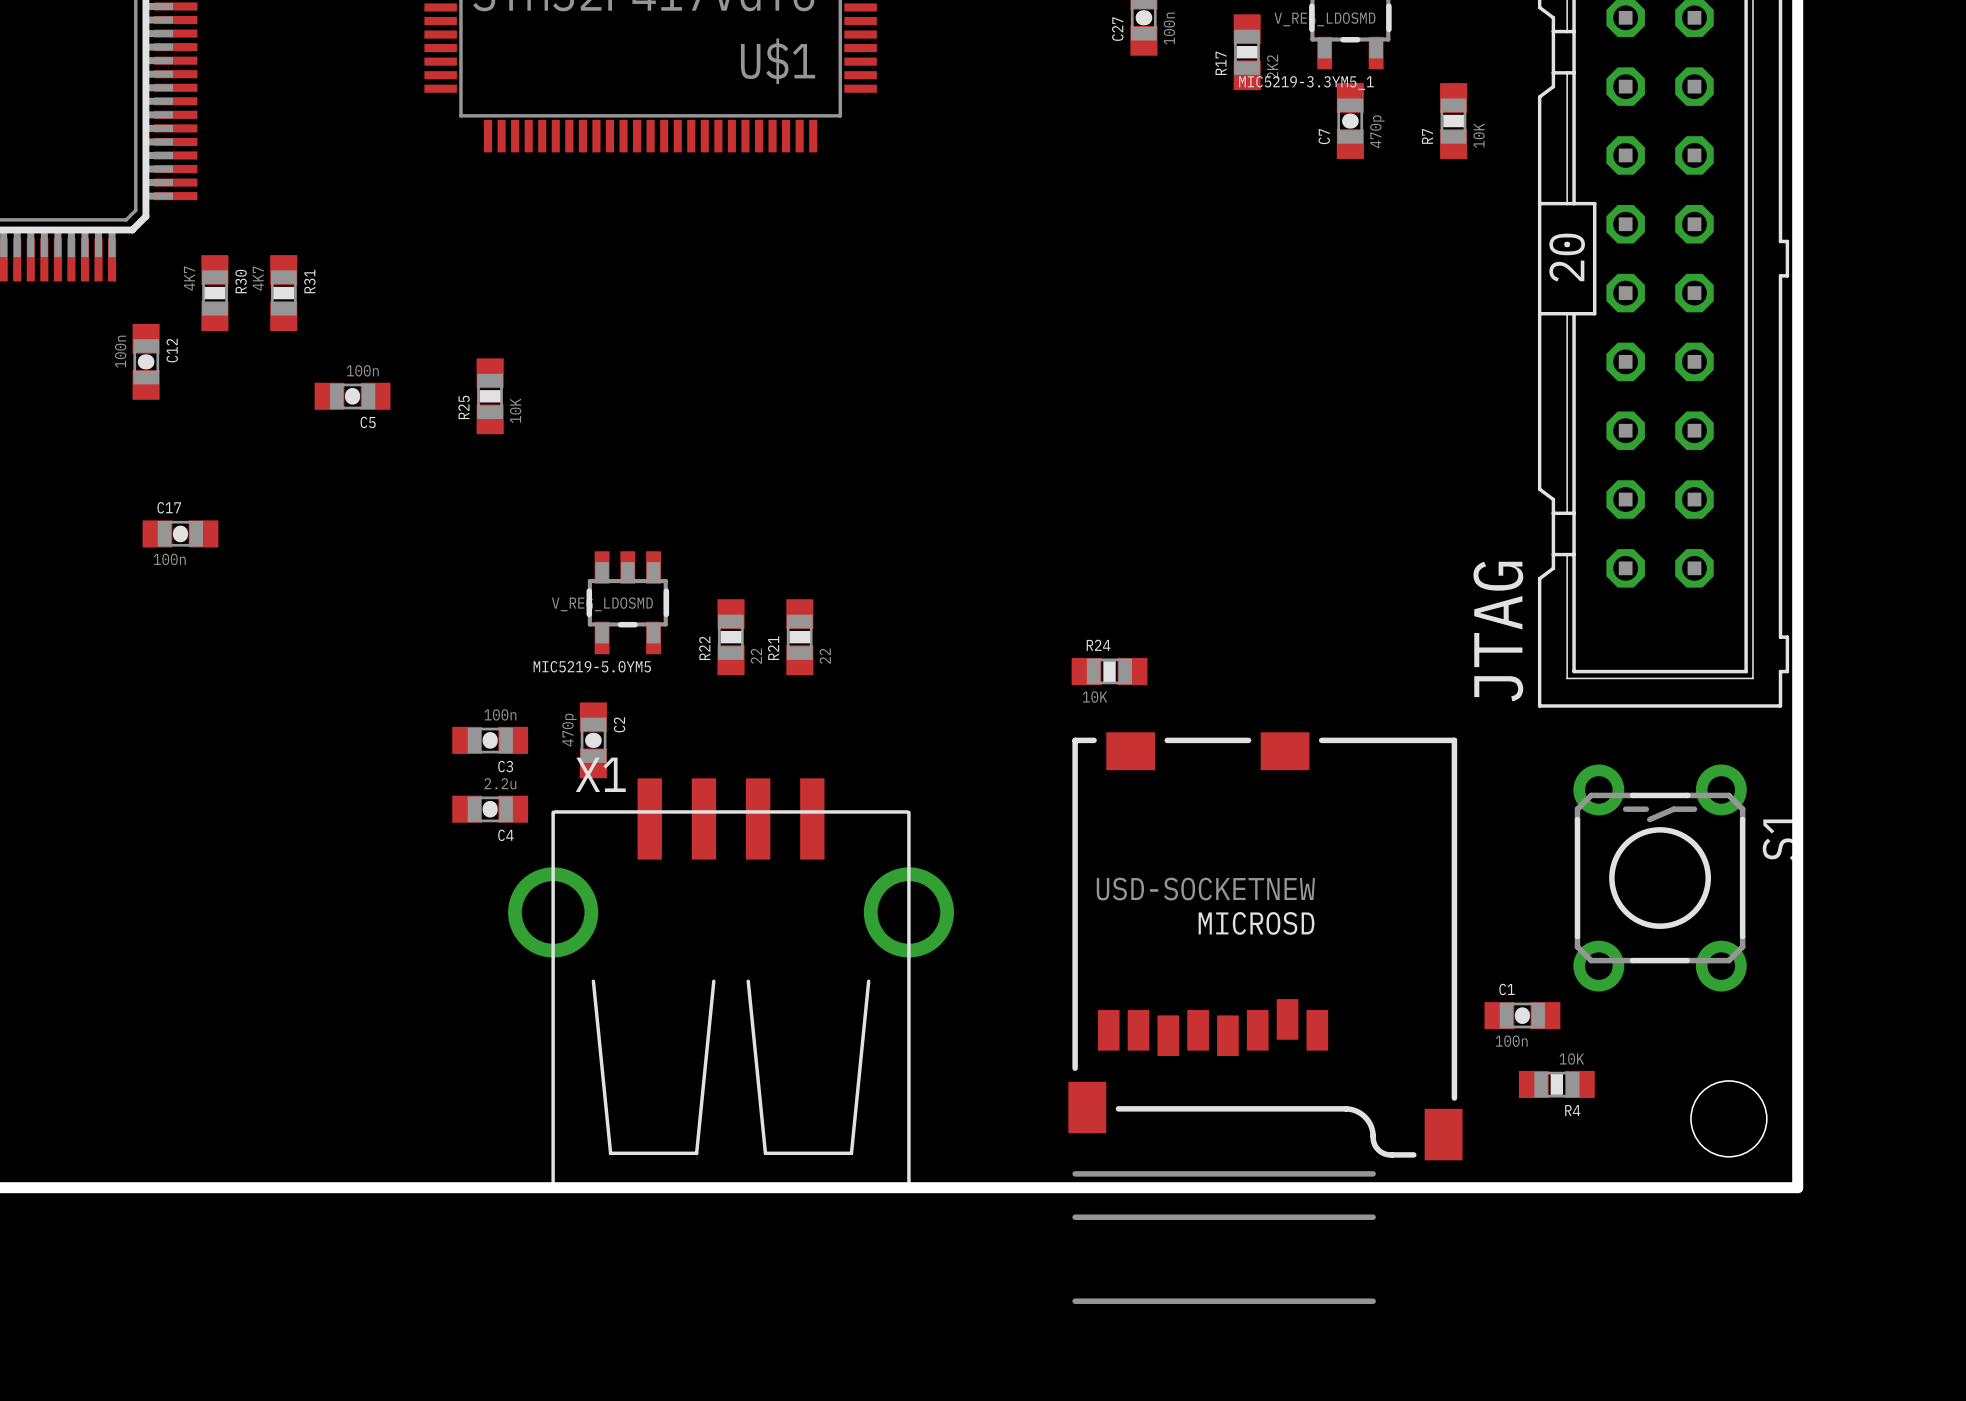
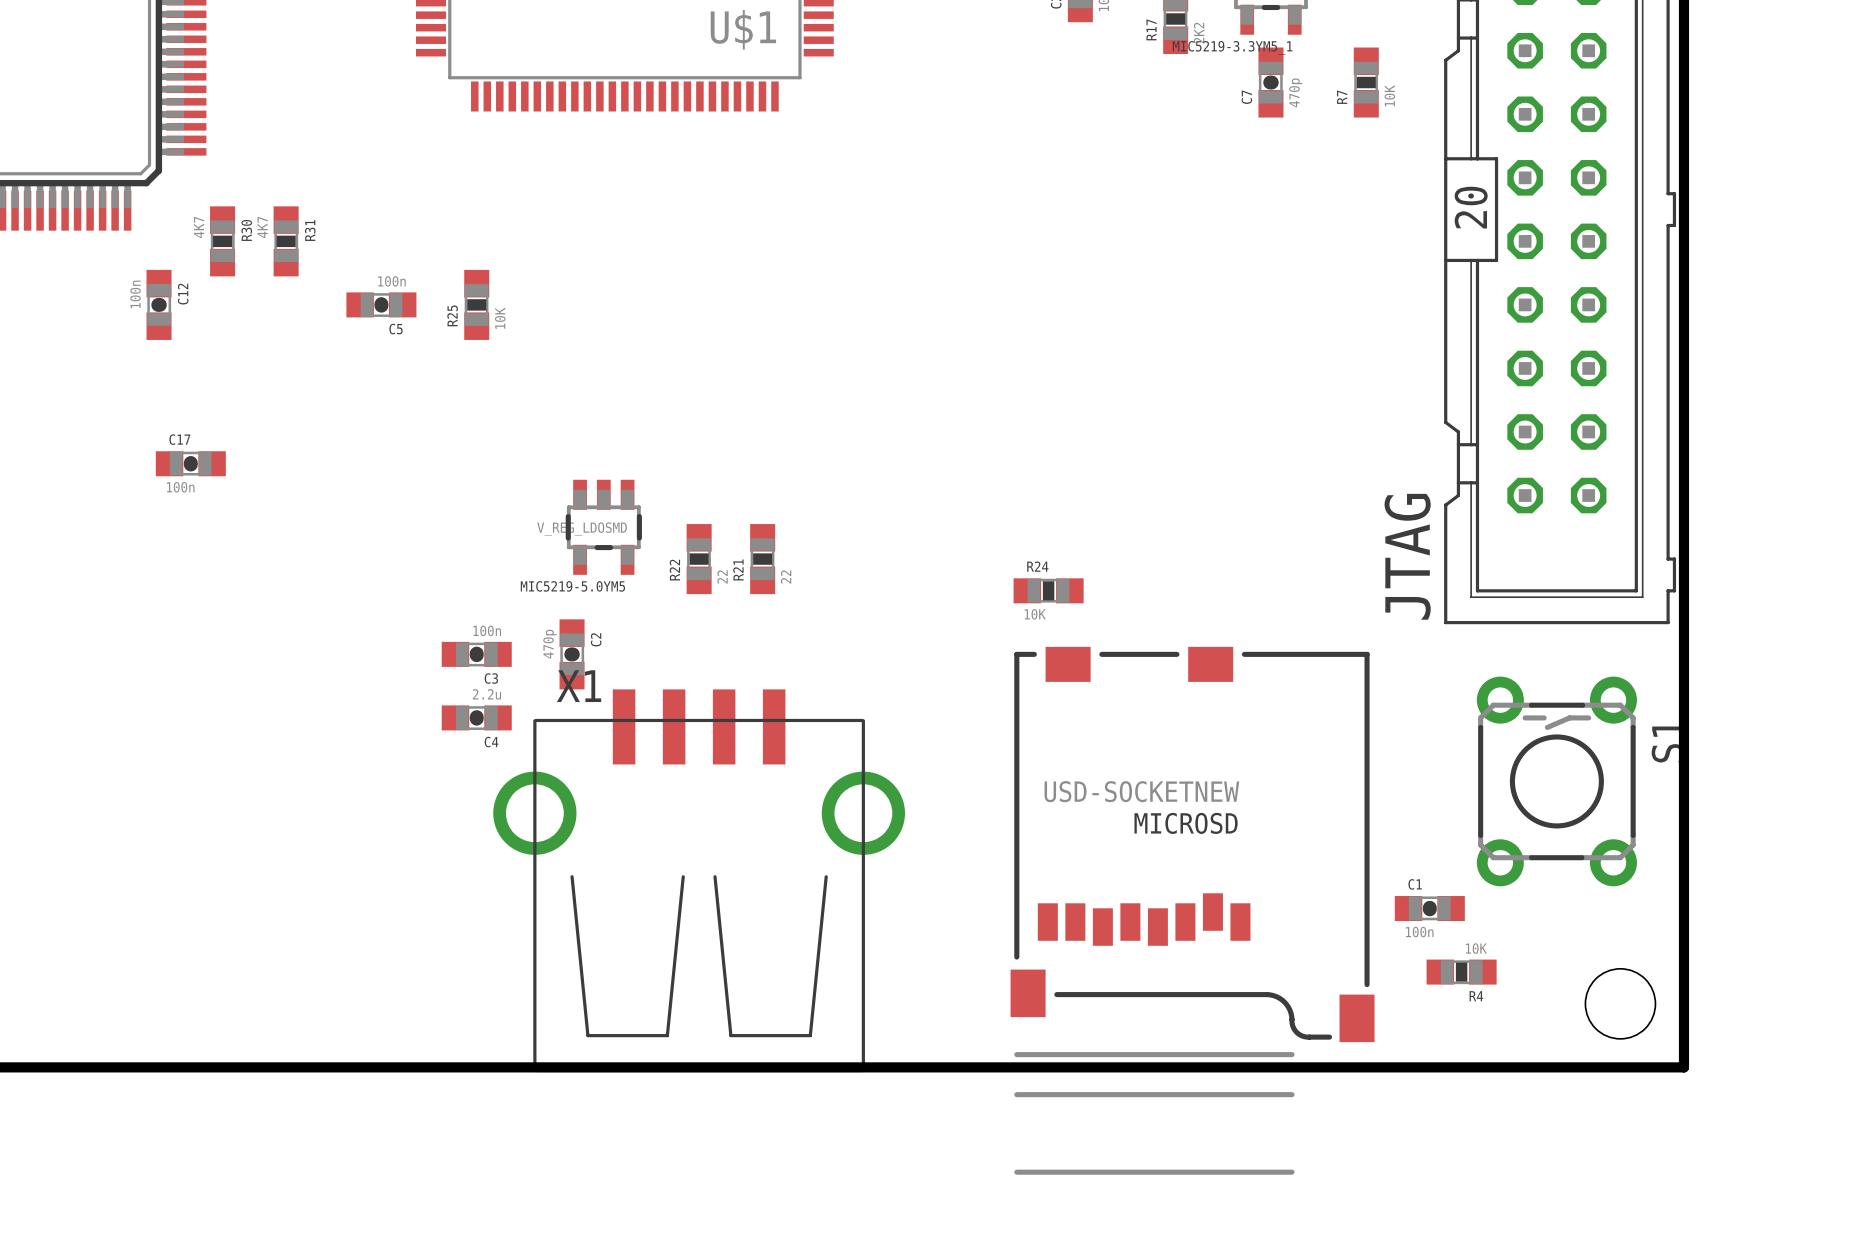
C5 position: (352, 396) -> (381, 304)
R25 position: (490, 396) -> (476, 304)

